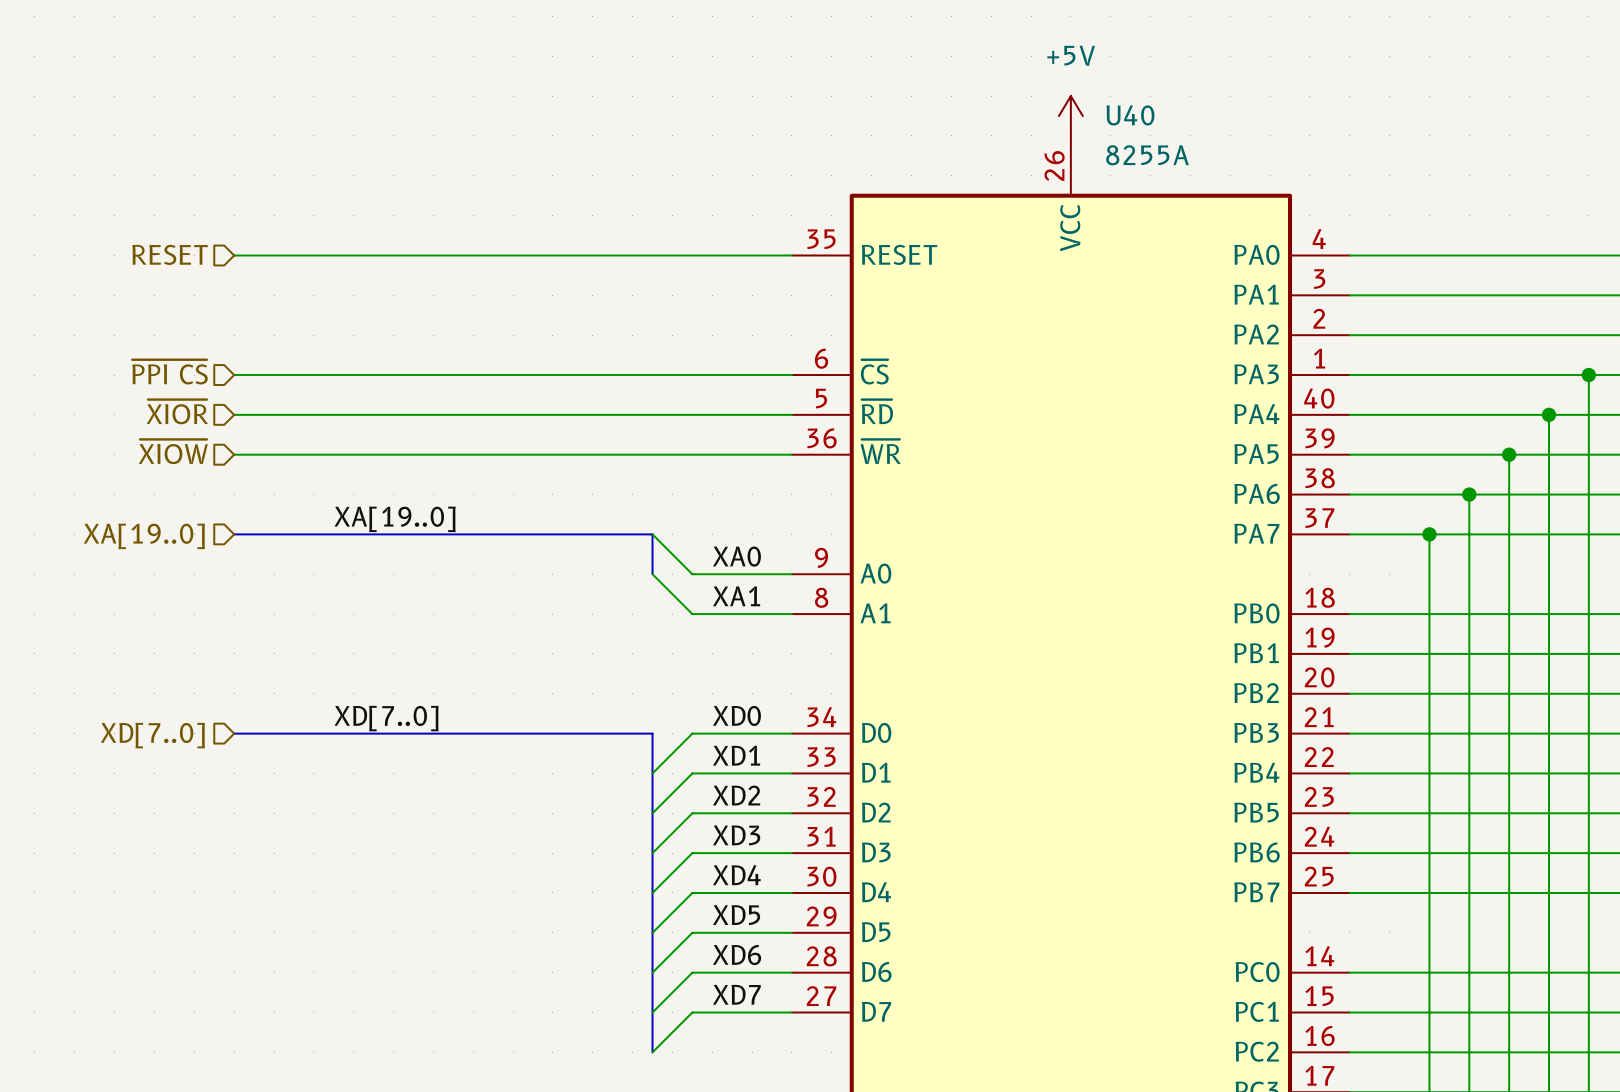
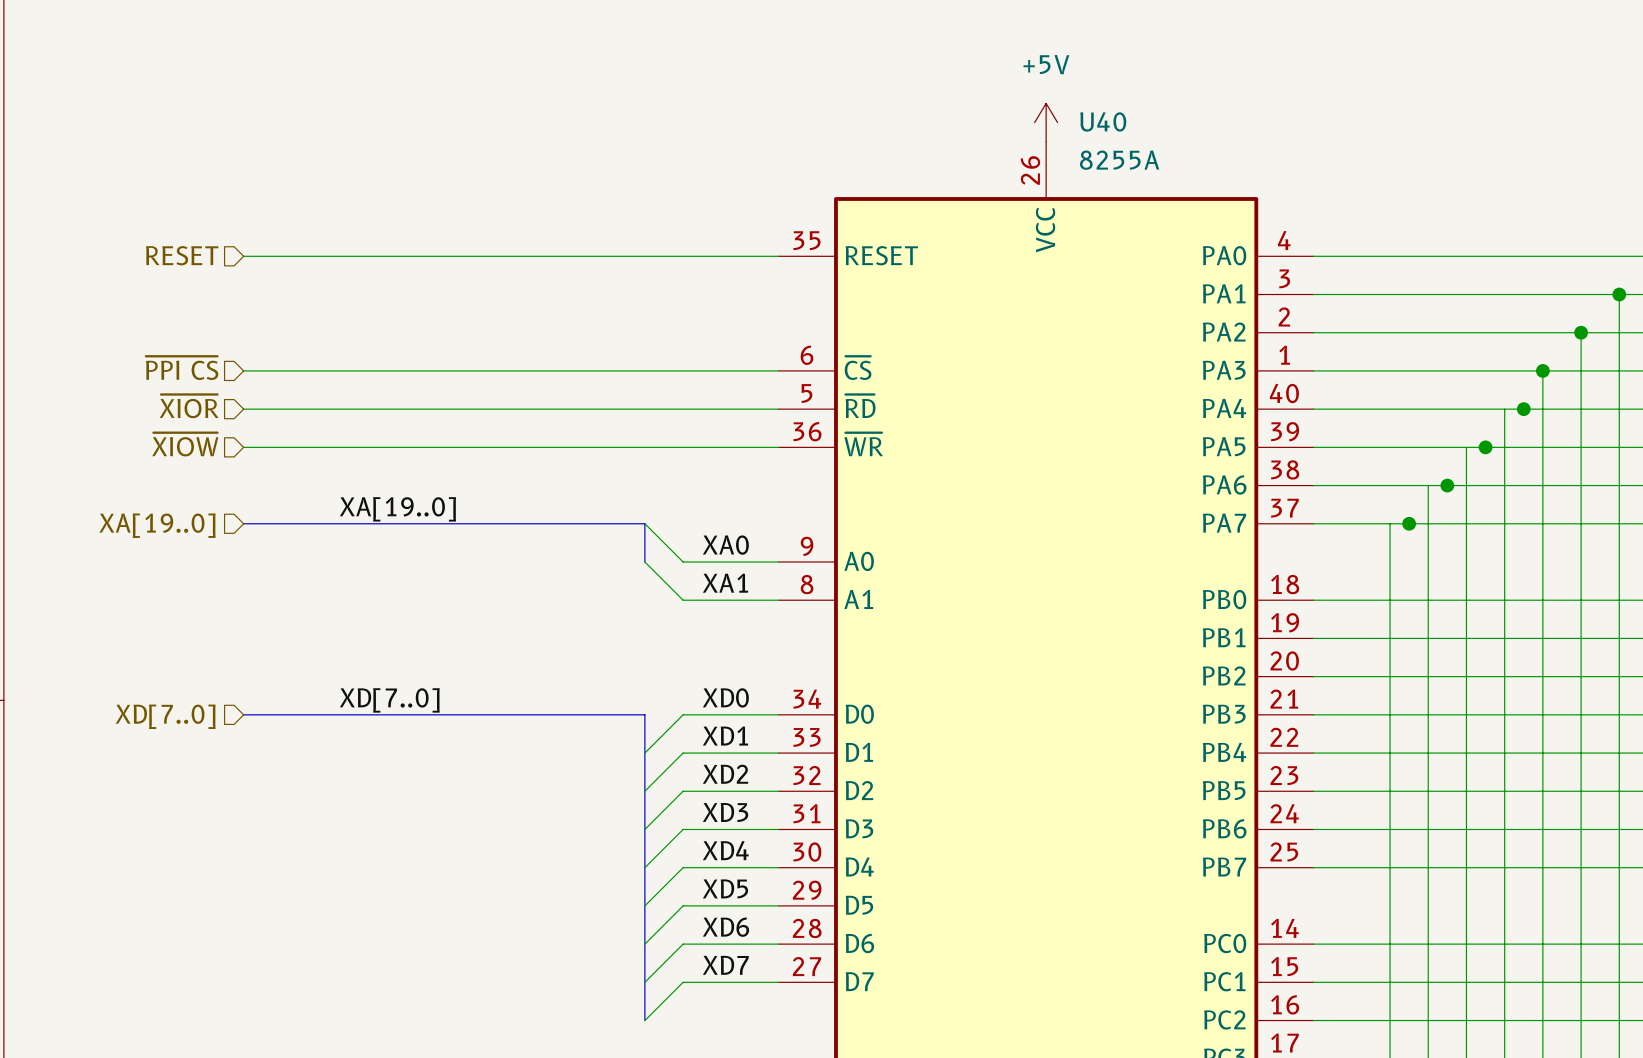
junction position: (1548, 414) -> (1523, 409)
junction position: (1509, 454) -> (1485, 447)
junction position: (1469, 494) -> (1447, 485)
junction position: (1429, 534) -> (1409, 523)

